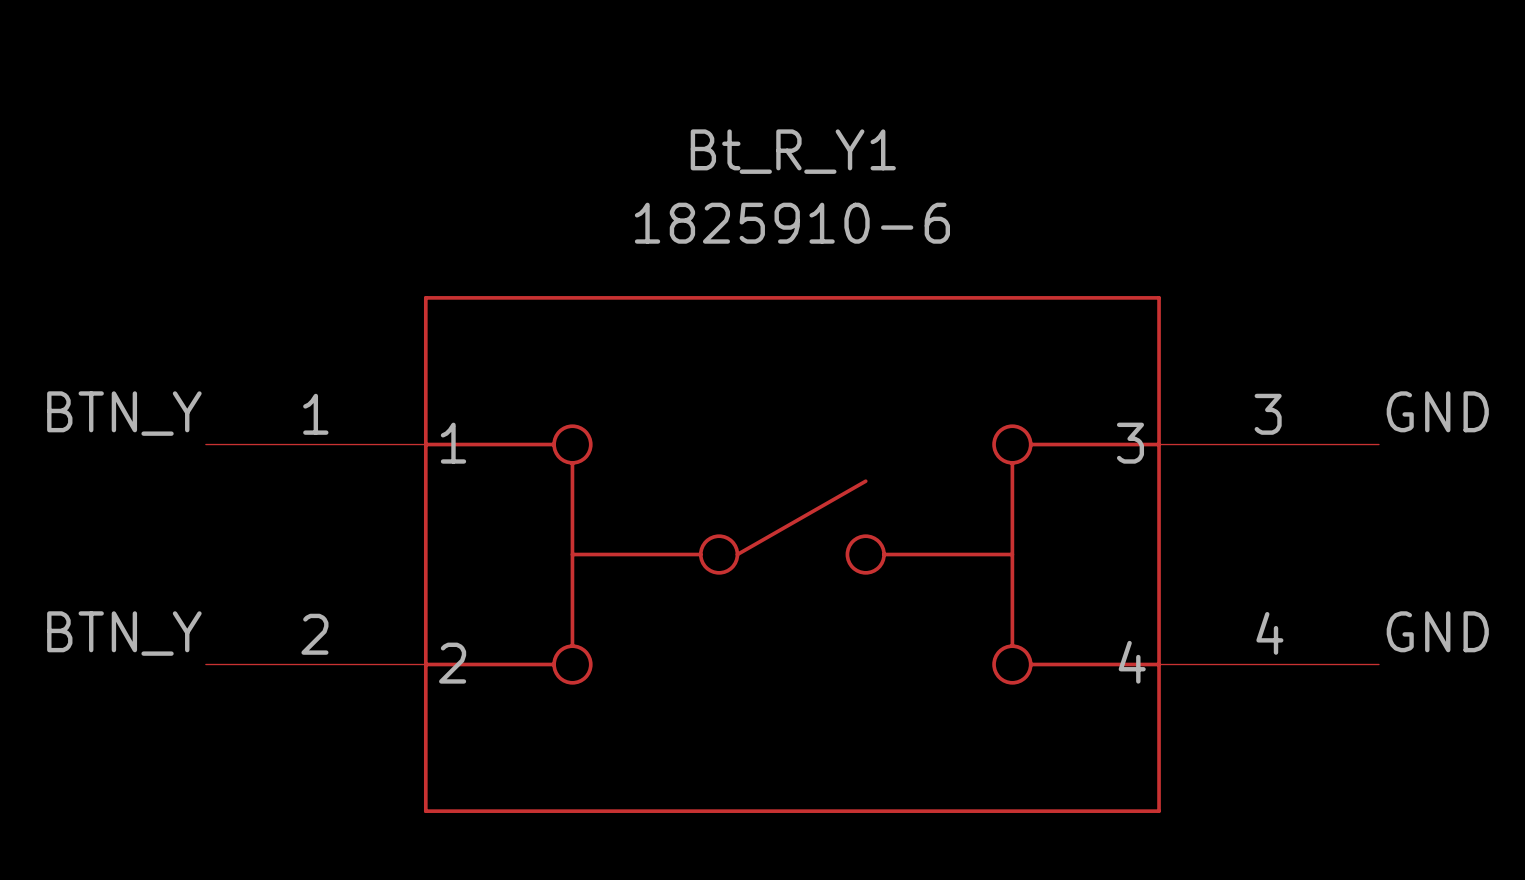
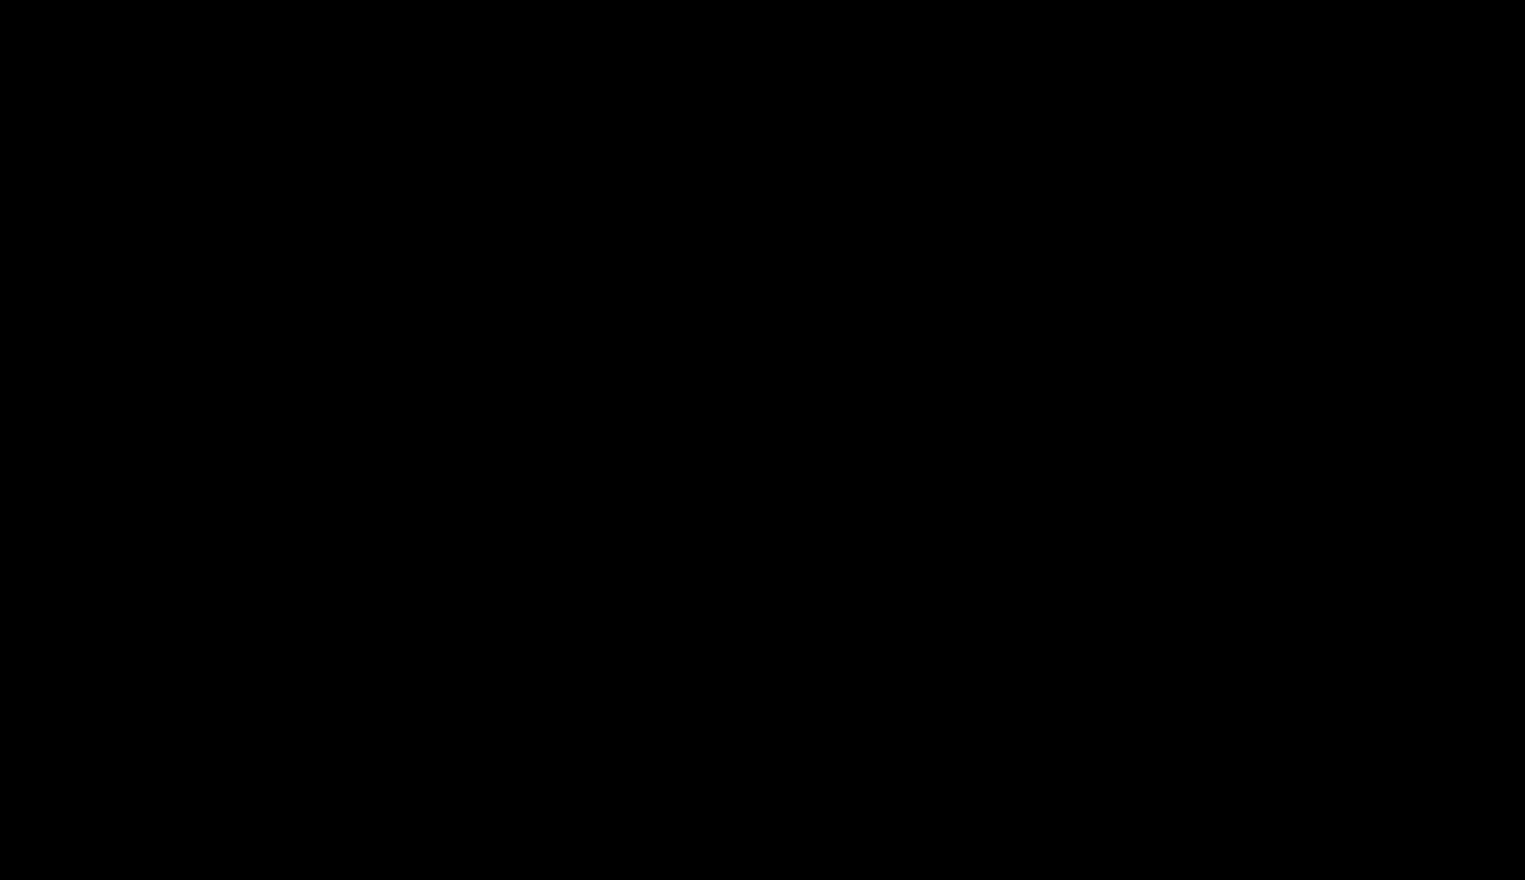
label: GND (1437, 411) -> none
label: BTN_Y (124, 413) -> none
Bt_R_Y1: 1825910-6 (792, 554) -> none
label: GND (1437, 631) -> none
label: BTN_Y (124, 633) -> none

